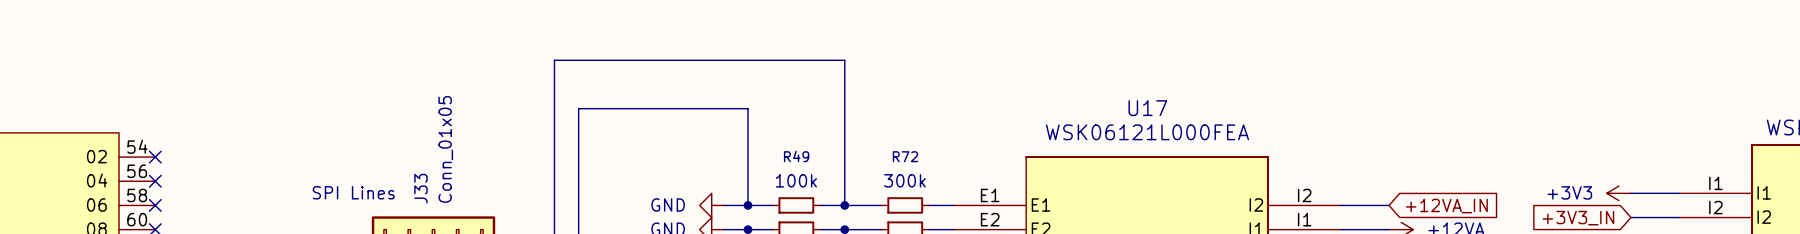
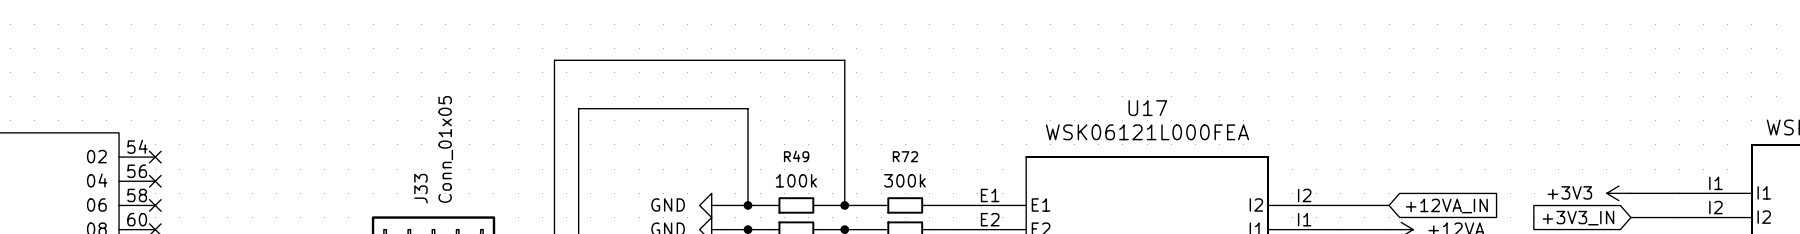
text: SPI Lines (353, 192) -> none

